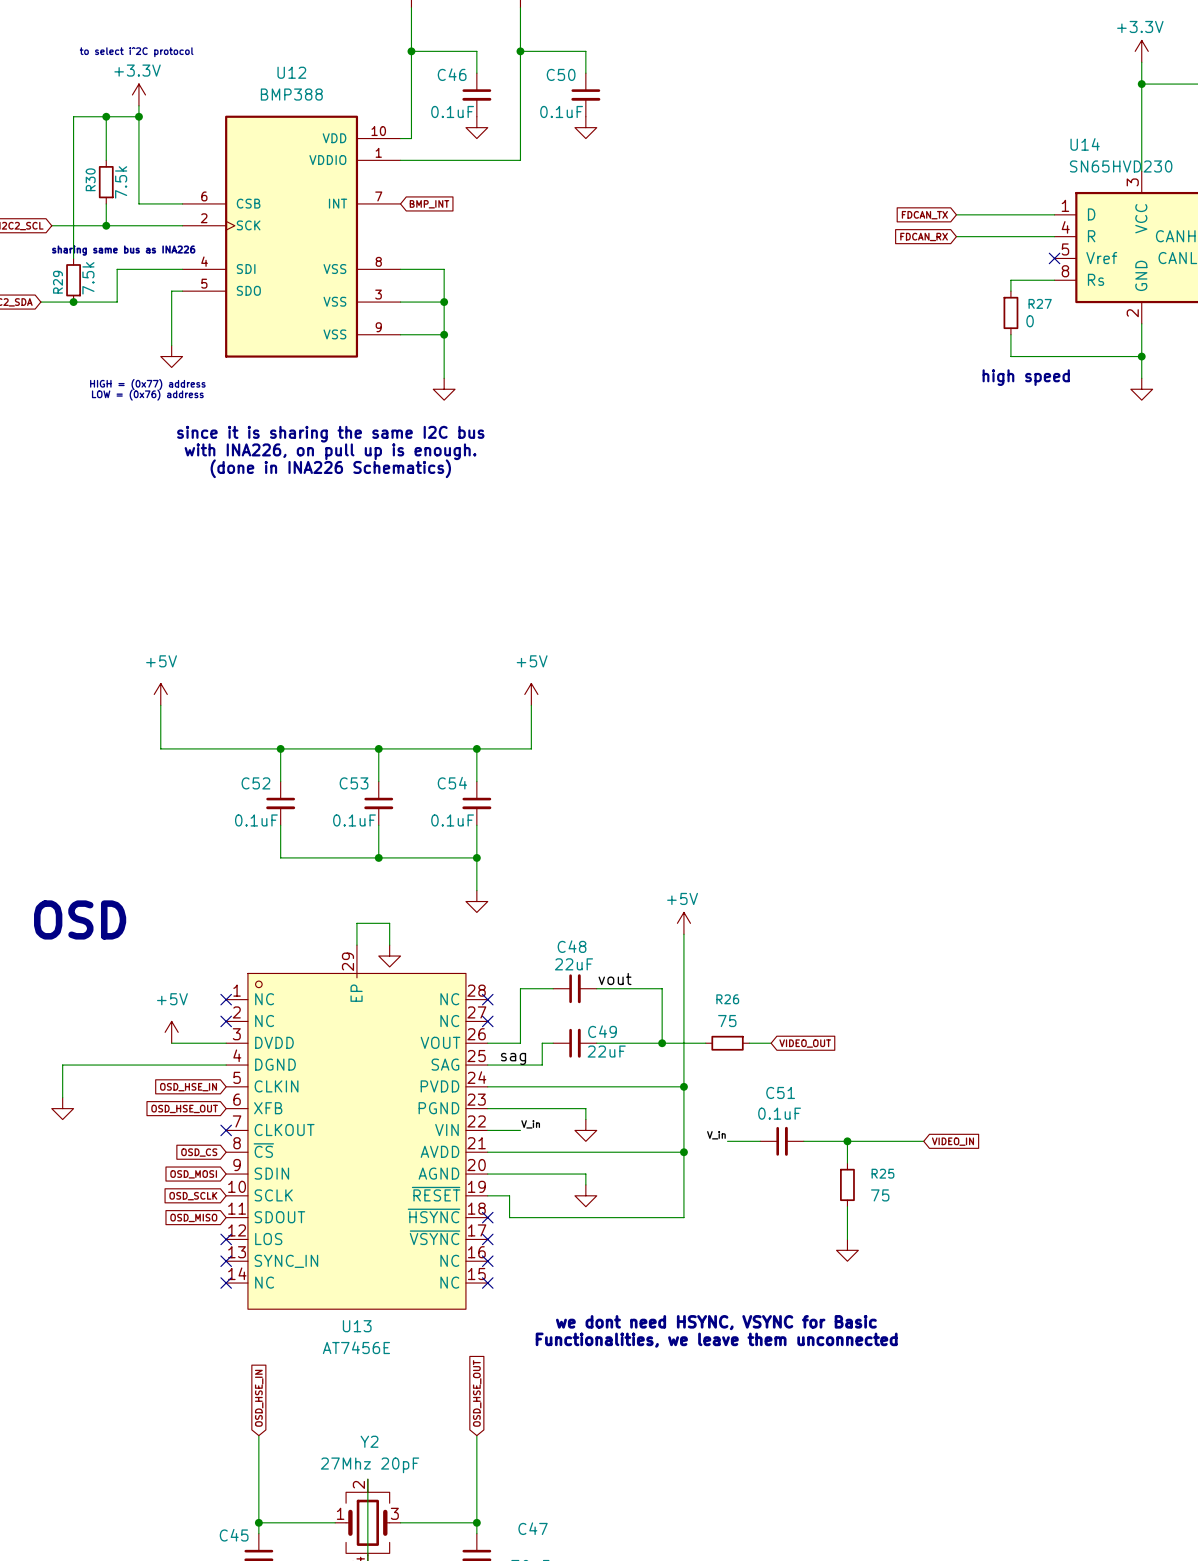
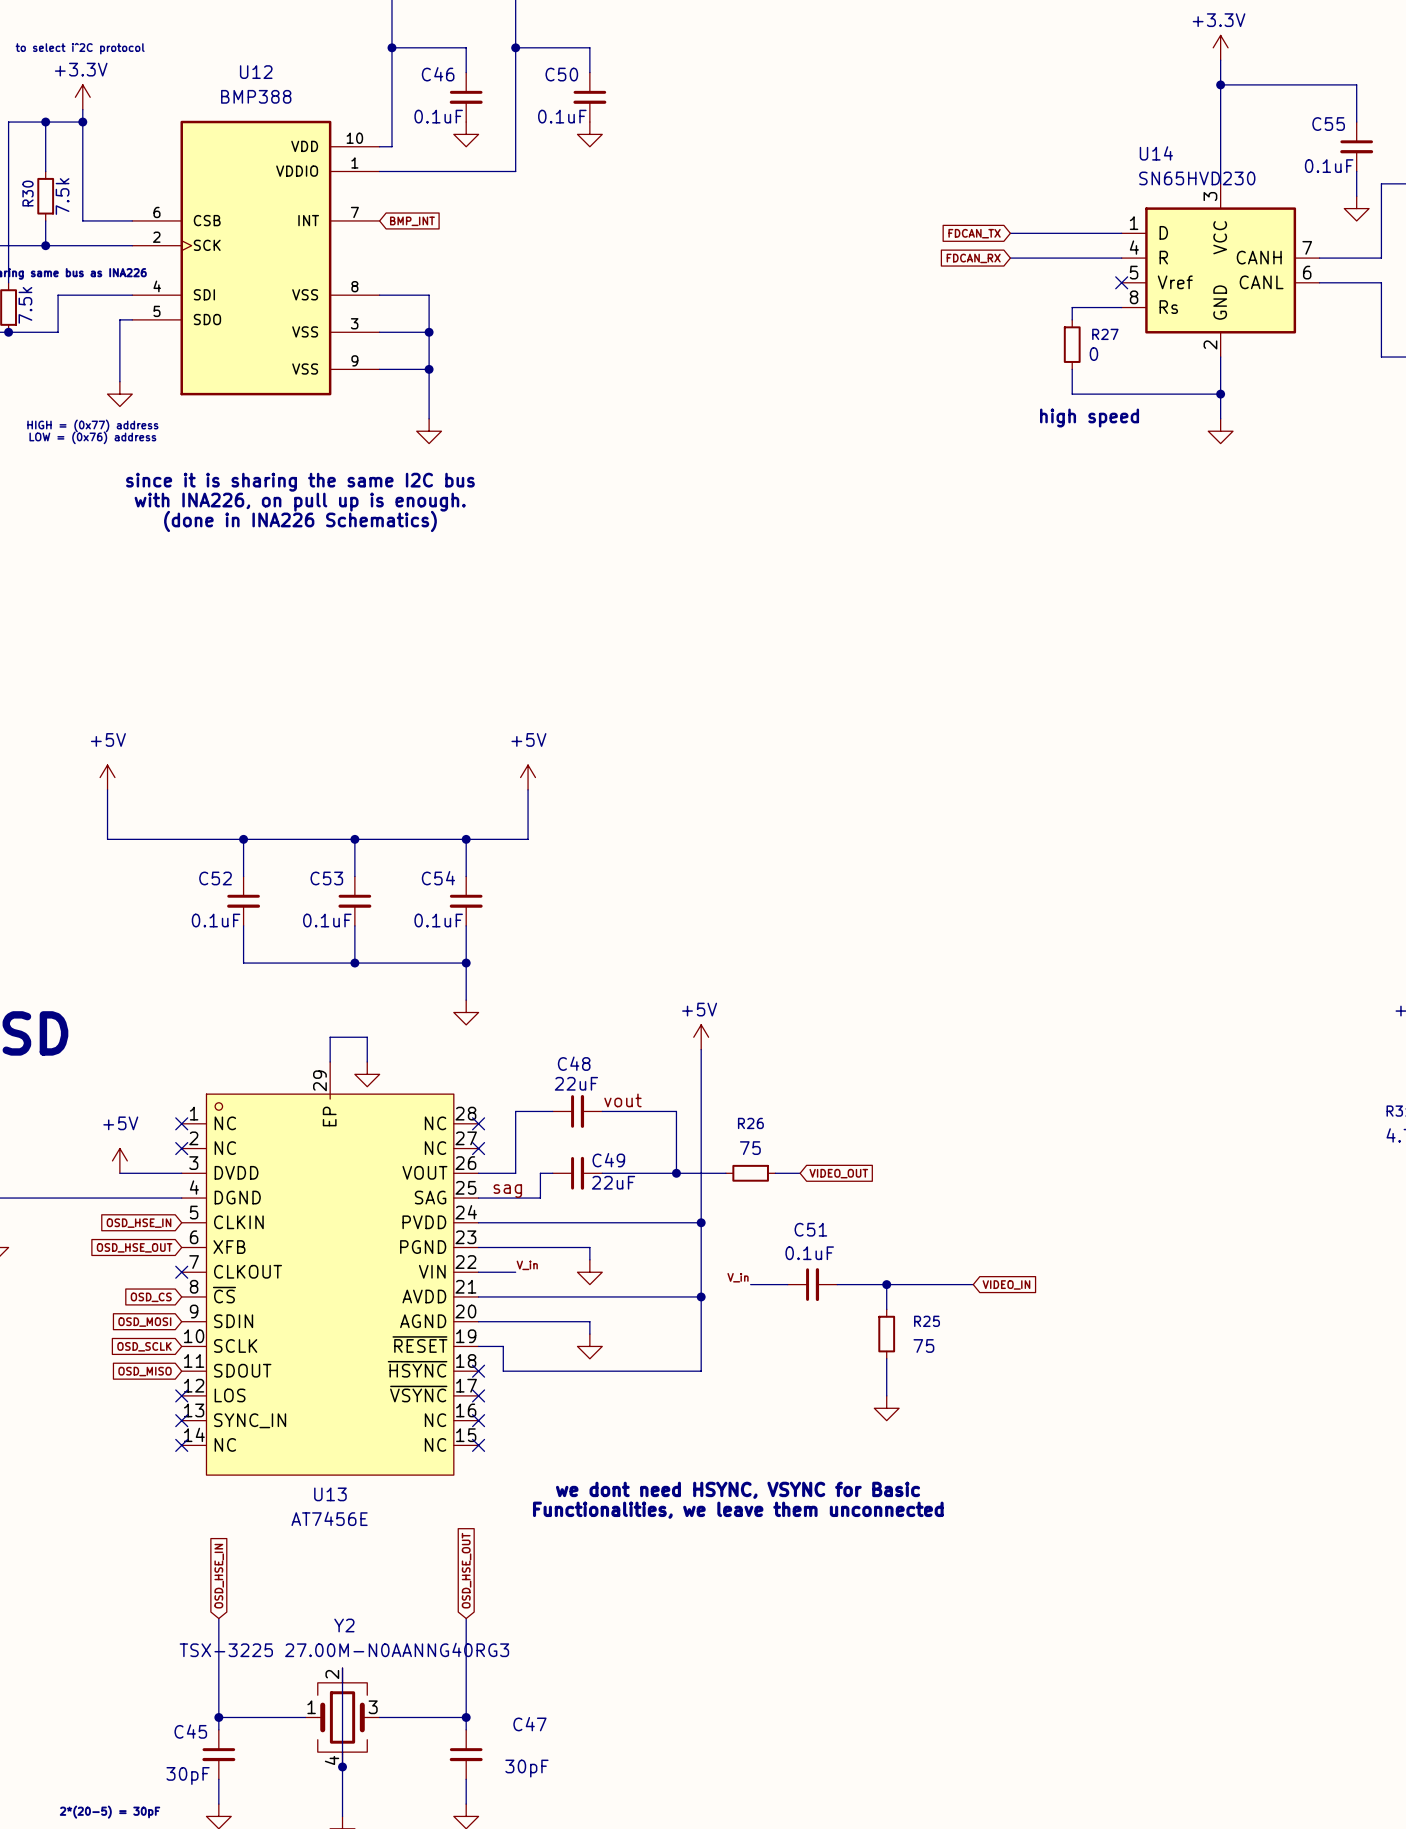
Y2 value: 27Mhz 20pF (370, 1465) -> TSX-3225 27.00M-N0AANNG40RG3 (344, 1649)

